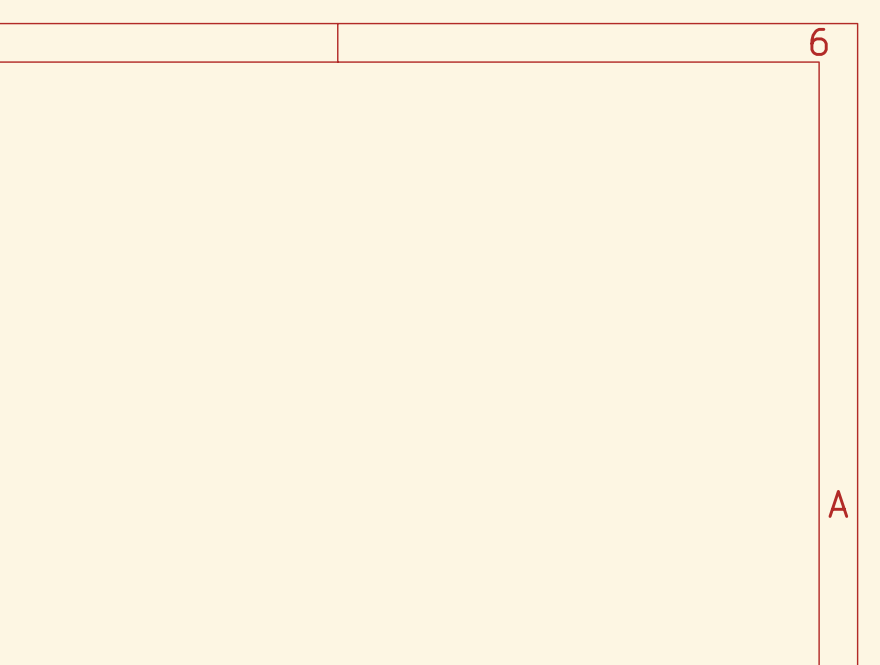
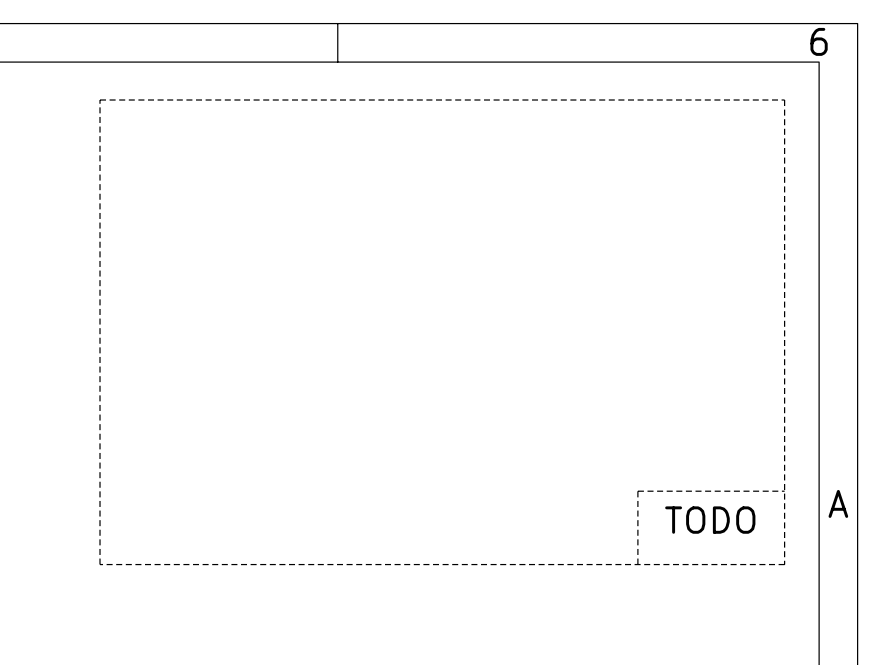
line: none -> (100, 100) (100, 564) (784, 564) (784, 100) (100, 100)
line: none -> (784, 491) (637, 491) (637, 564)
text: none -> TODO (710, 520)

